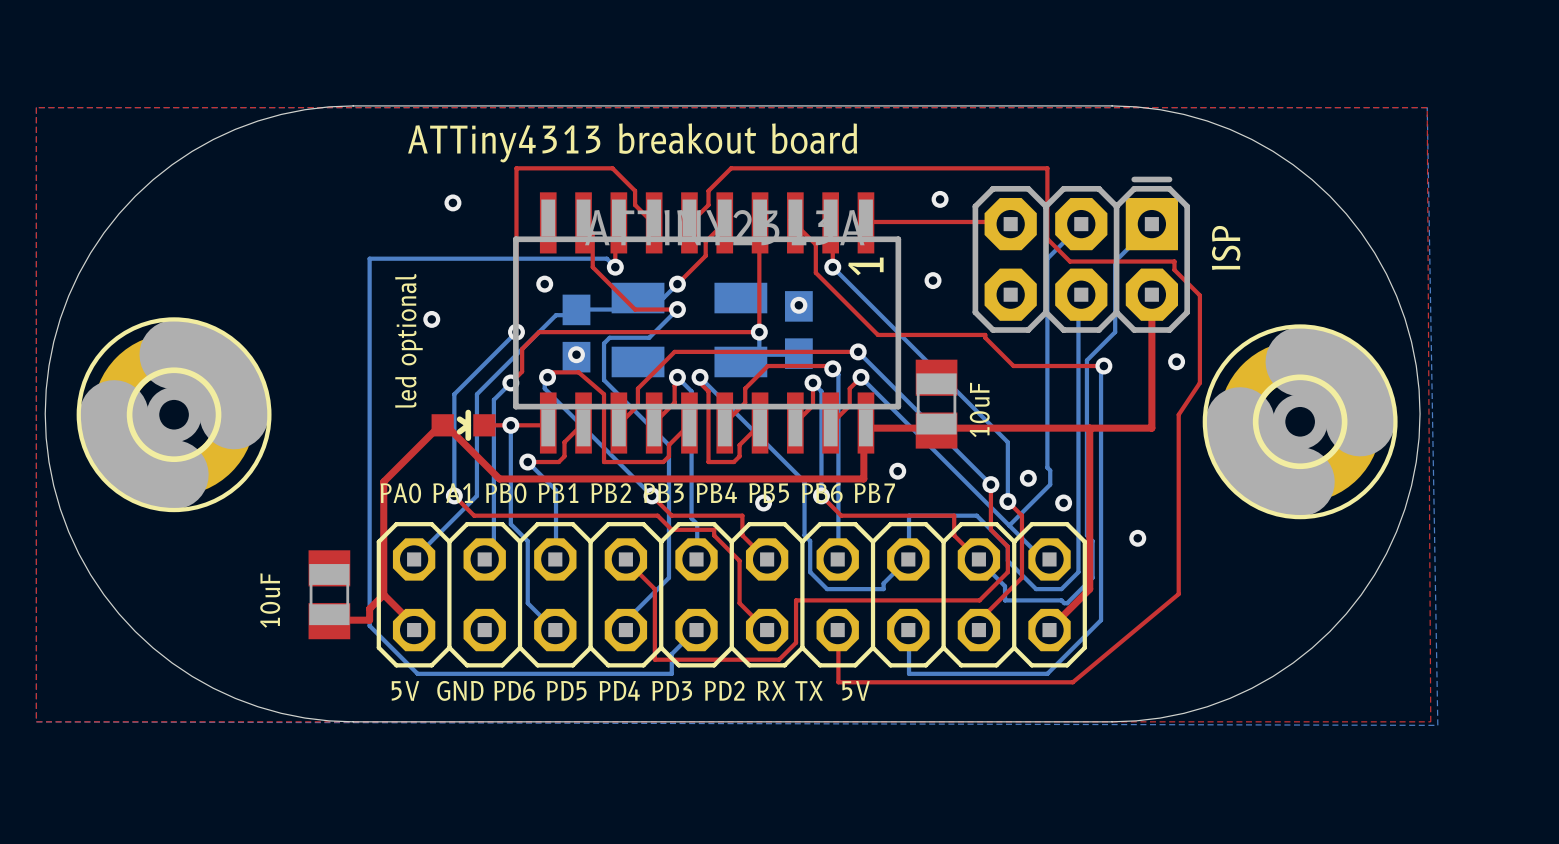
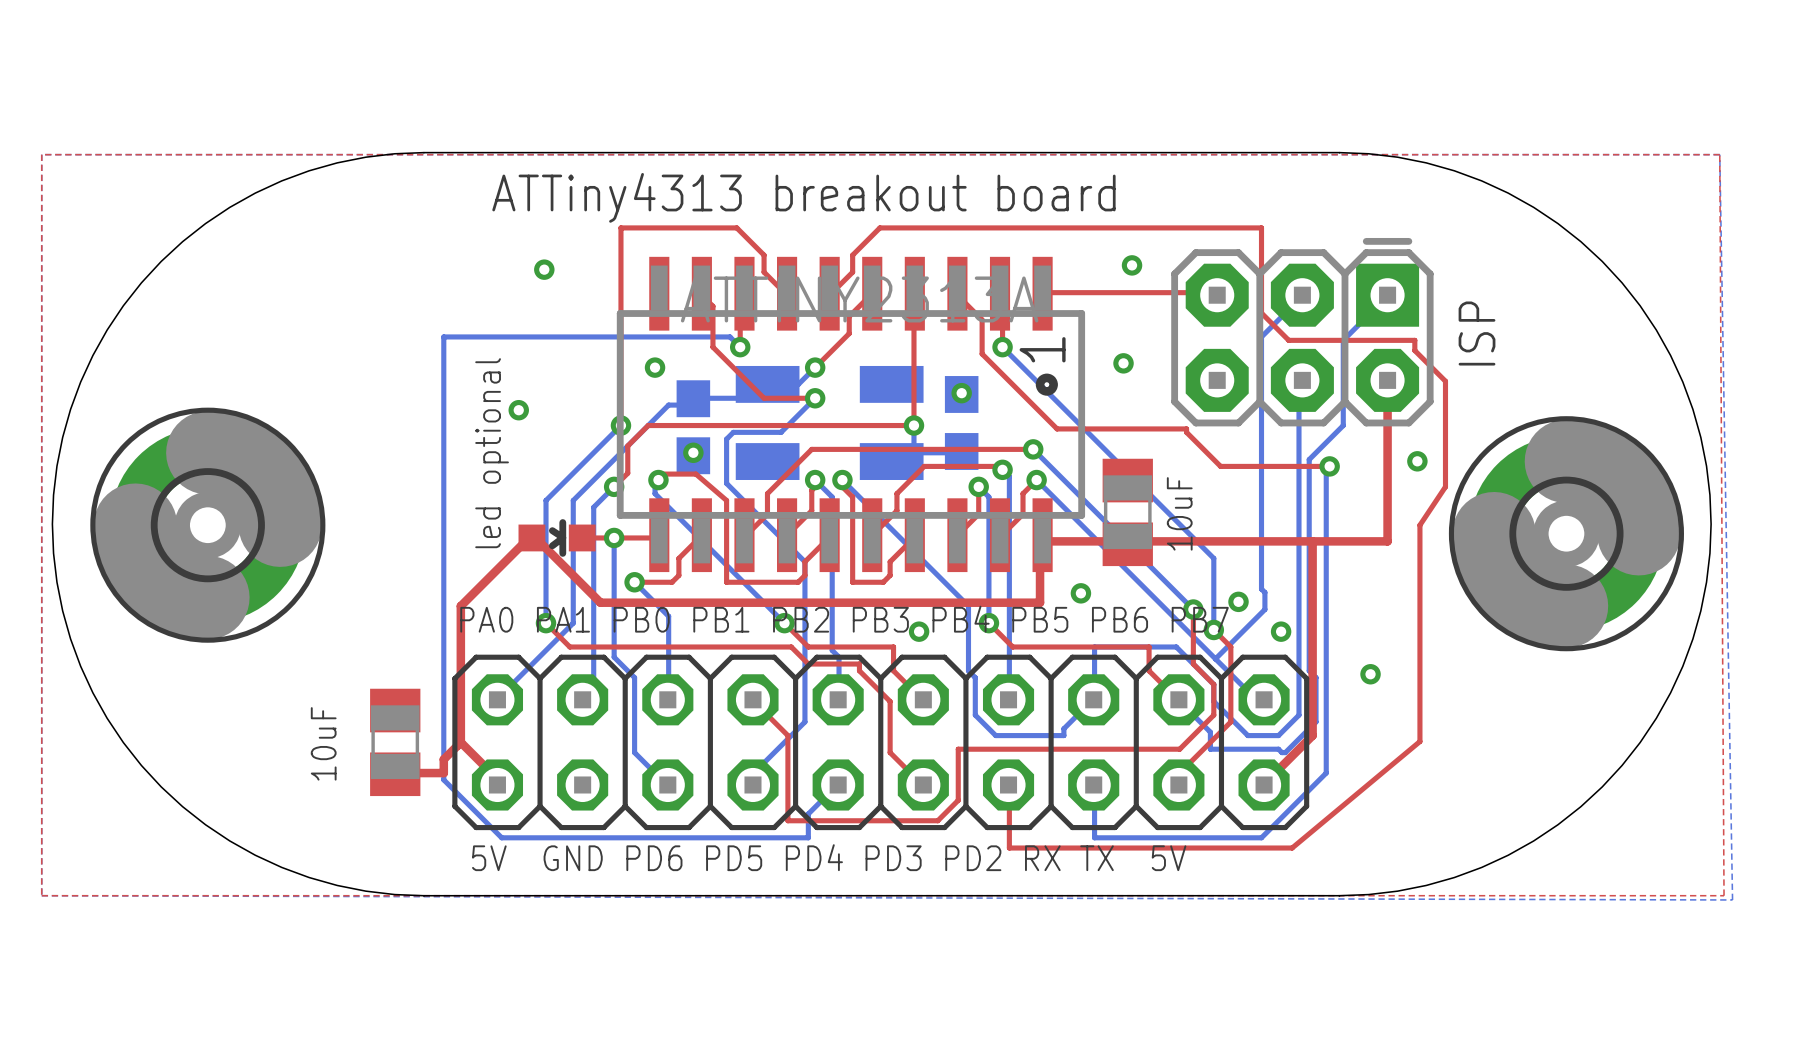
drawing: none -> [1035, 373, 1058, 396]

